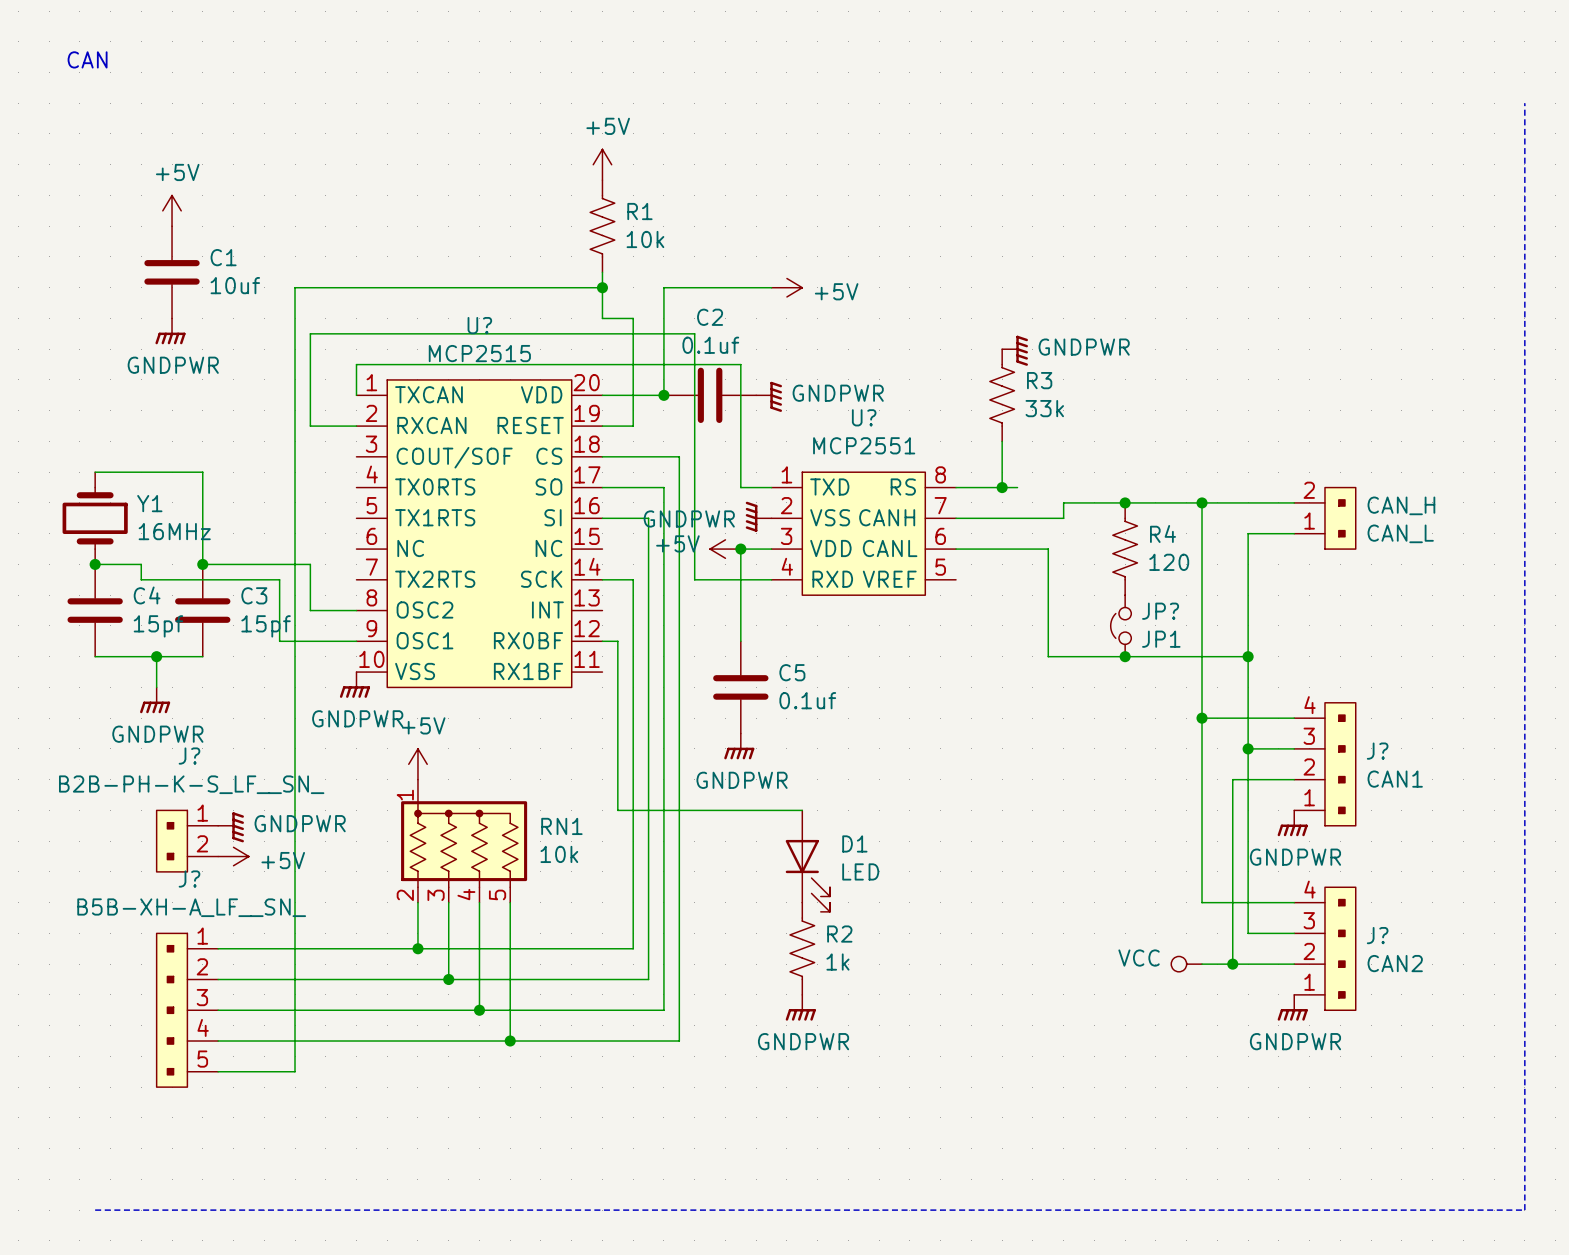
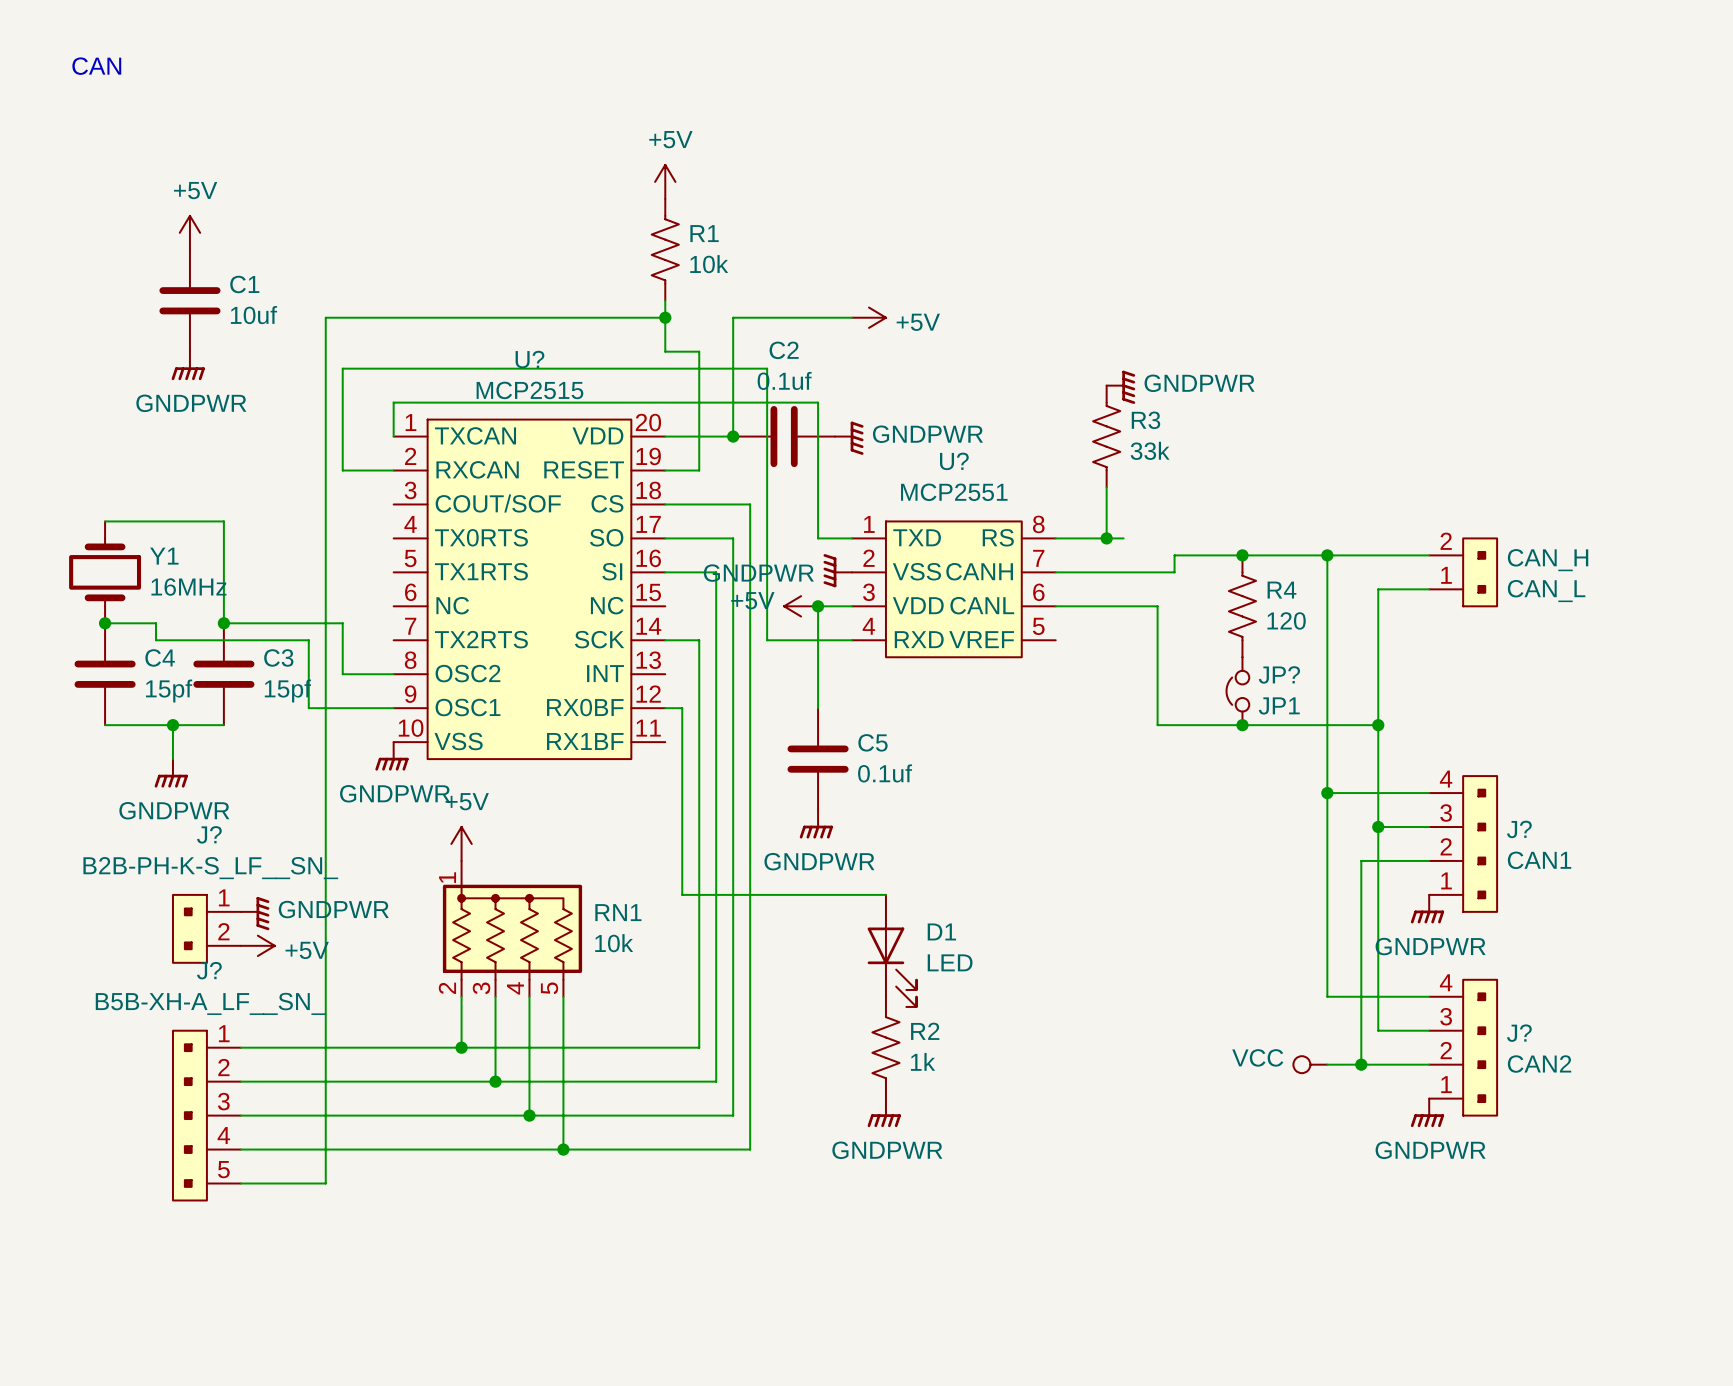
line: (1524, 103) (1524, 1210) (95, 1210) -> none

